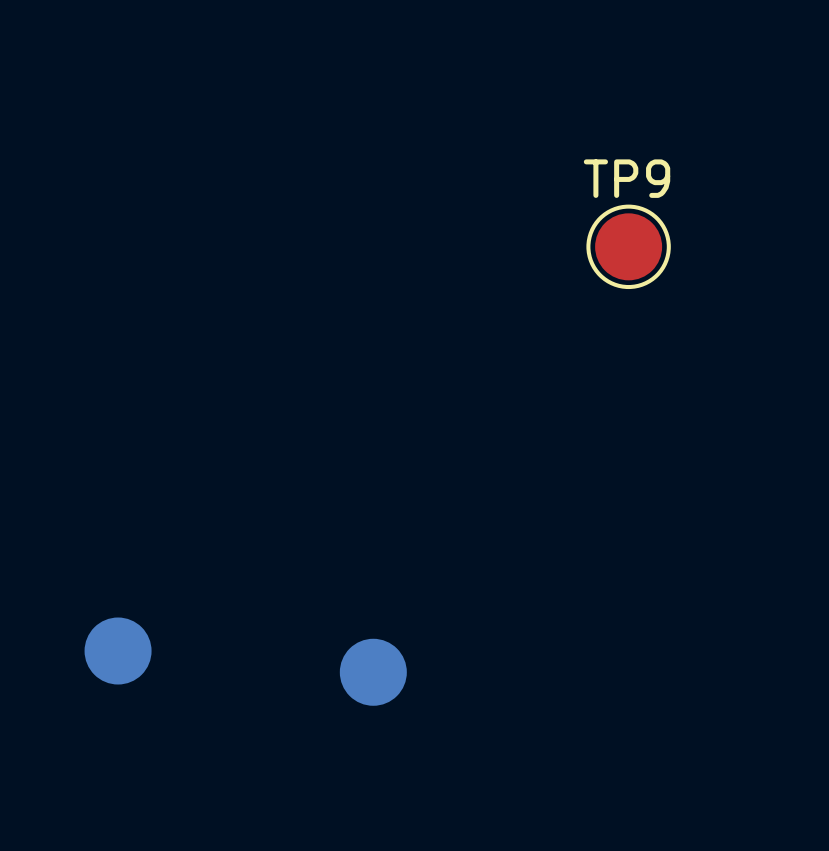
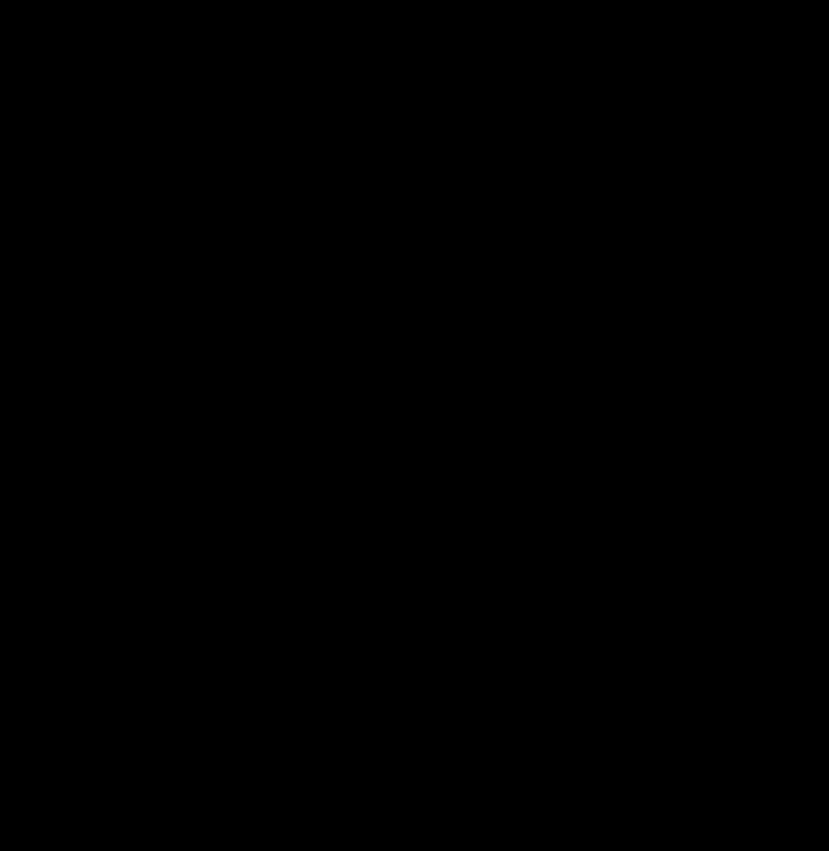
TP9: (628, 246) -> none
part: (118, 651) -> none
part: (373, 672) -> none

